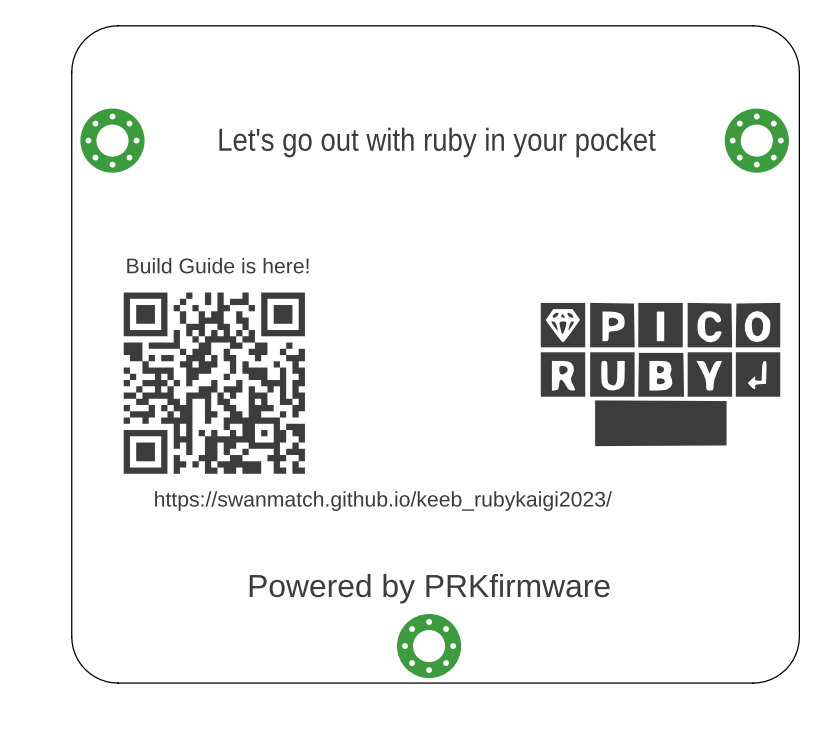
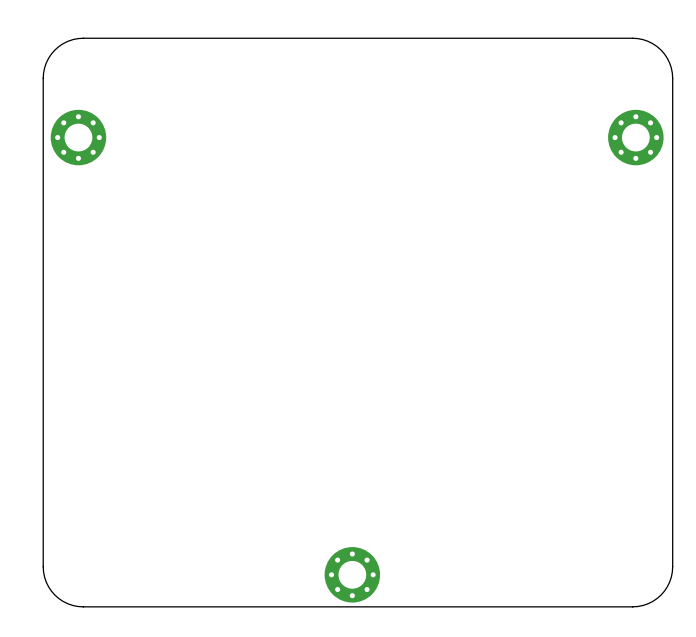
text: Let's go out with ruby in your pocket (437, 142) -> none
text: Build Guide is here! (217, 265) -> none
drawing: [123, 292, 305, 474] -> none
drawing: [540, 302, 781, 447] -> none
text: https://swanmatch.github.io/keeb_rubykaigi2023/ (383, 501) -> none
text: Powered by PRKfirmware (429, 588) -> none

